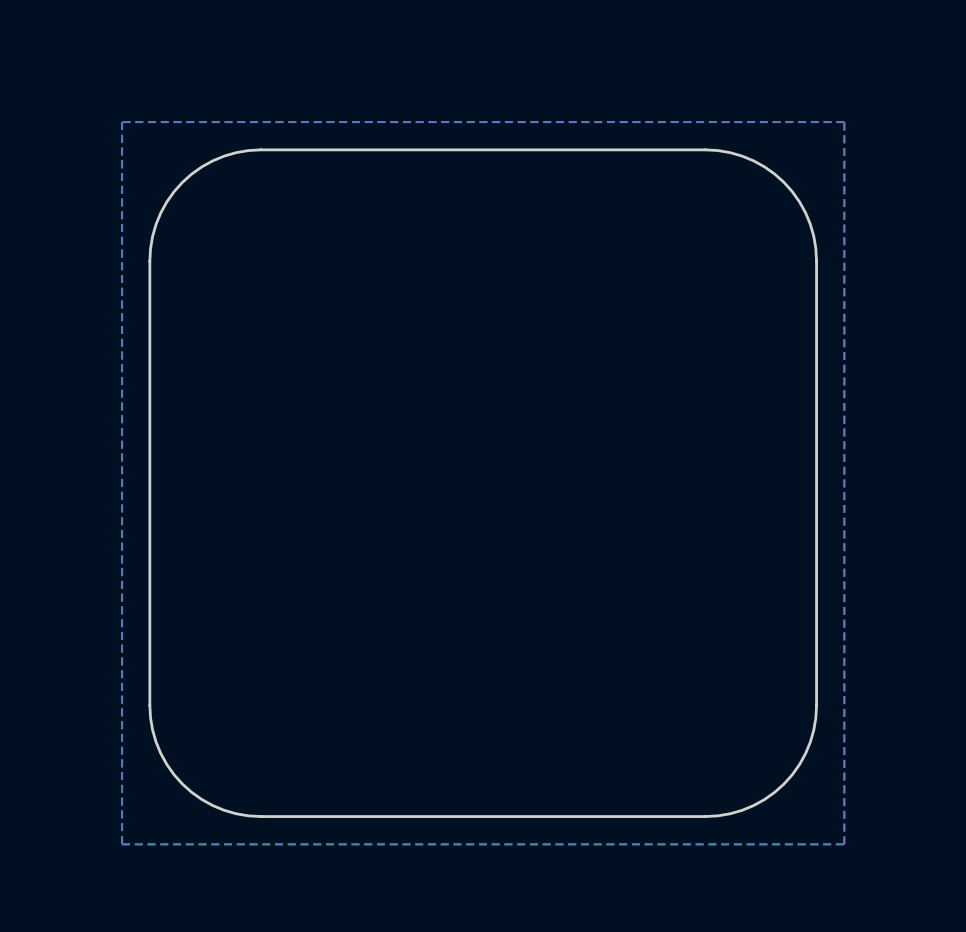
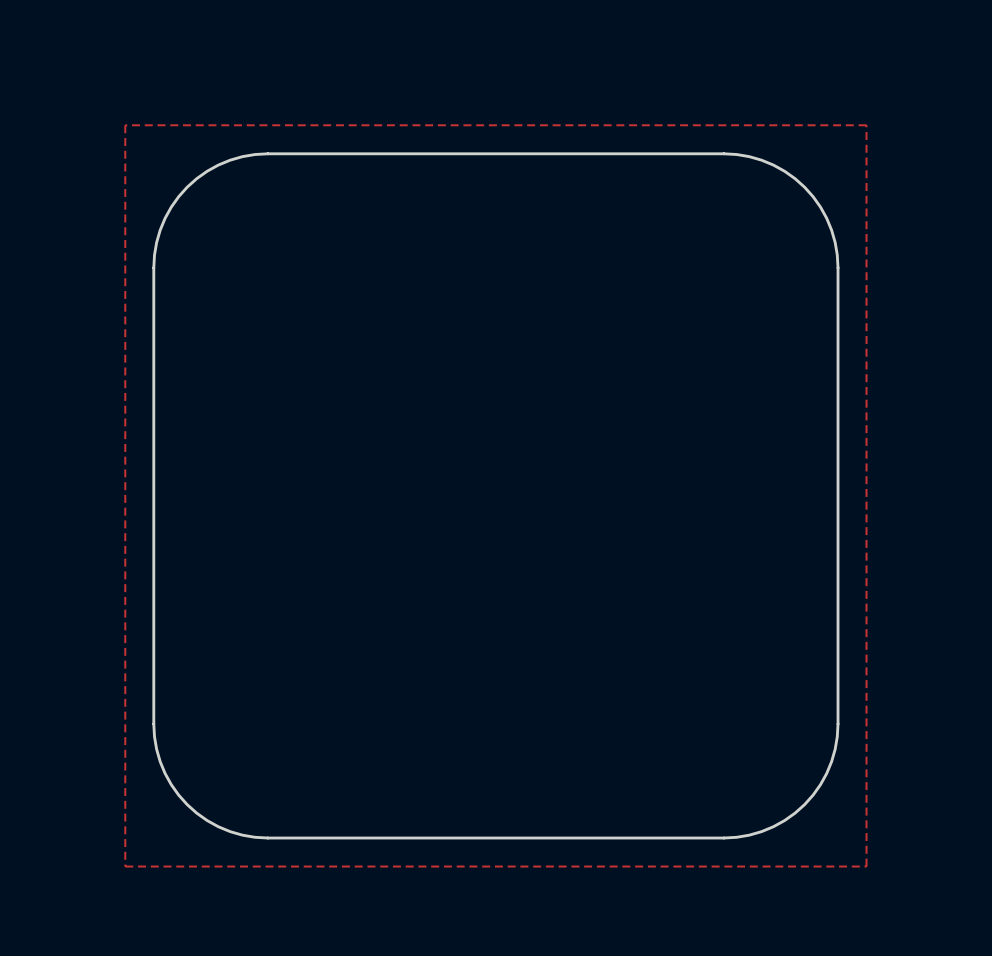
bottom zone outline: (844, 122) (122, 122) (122, 844) (844, 844) (844, 122) -> none

